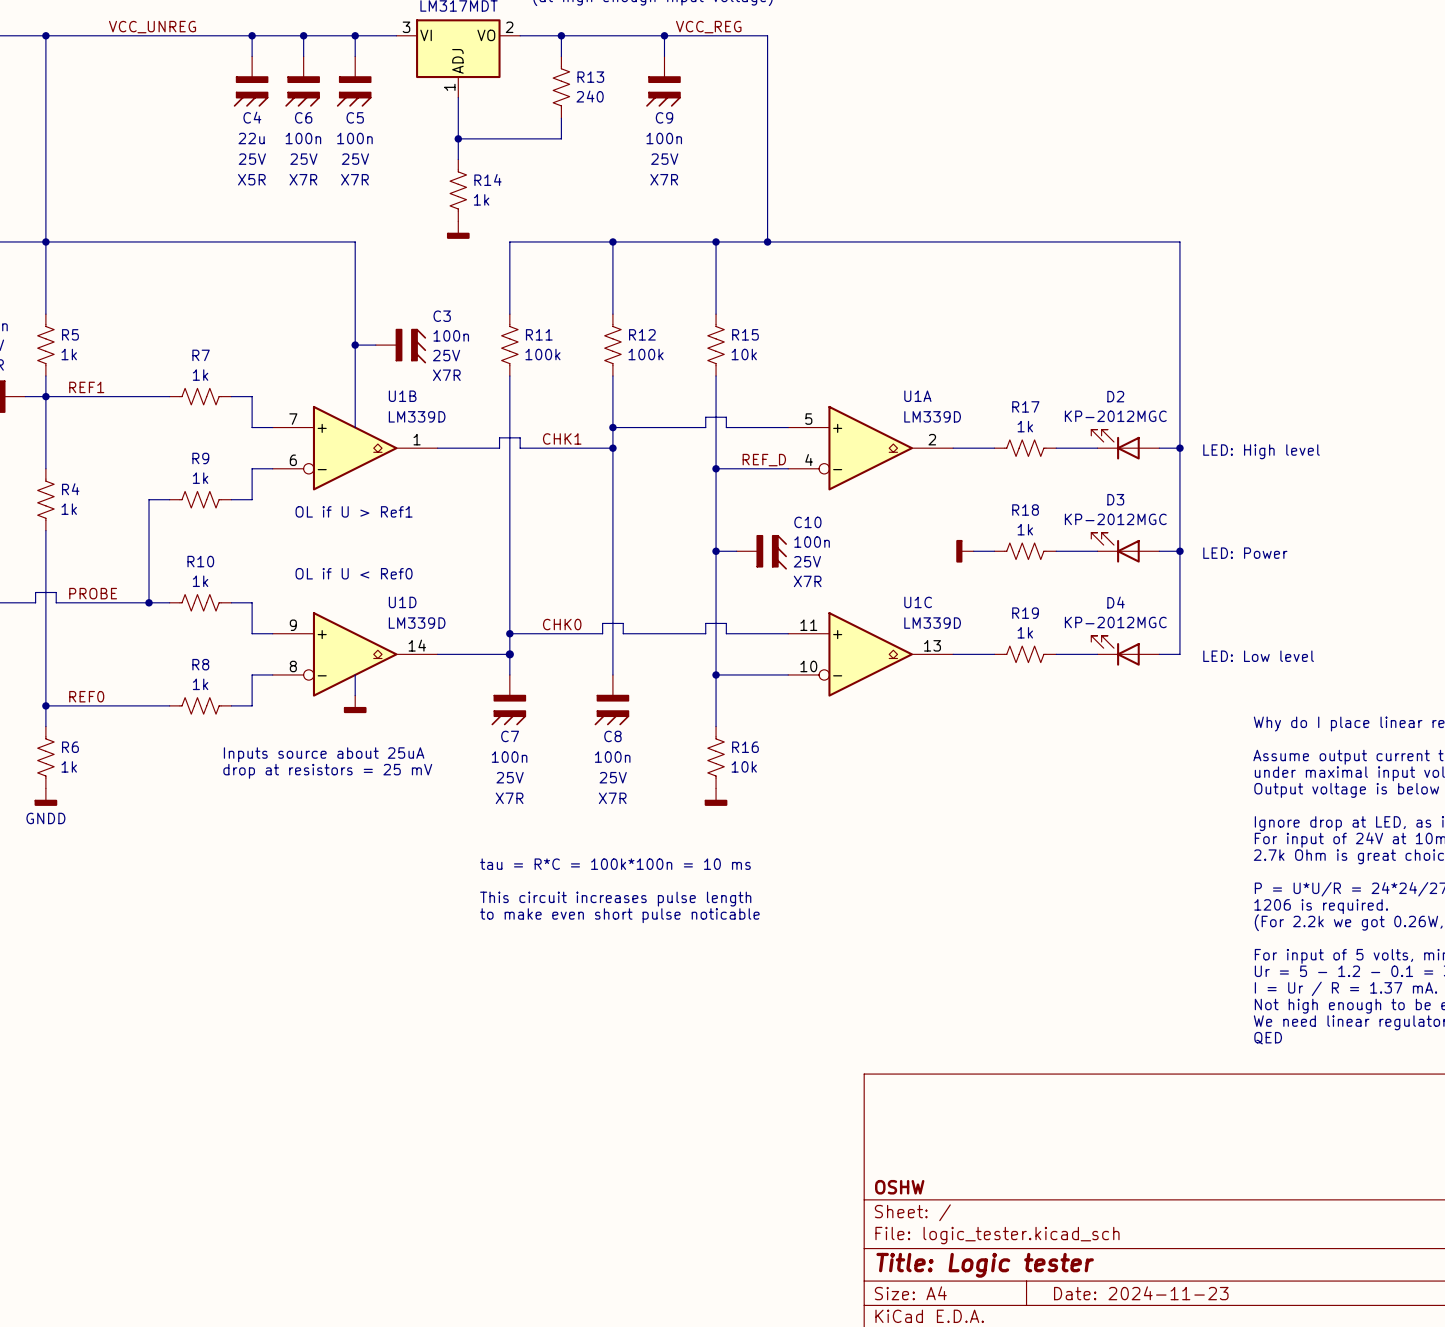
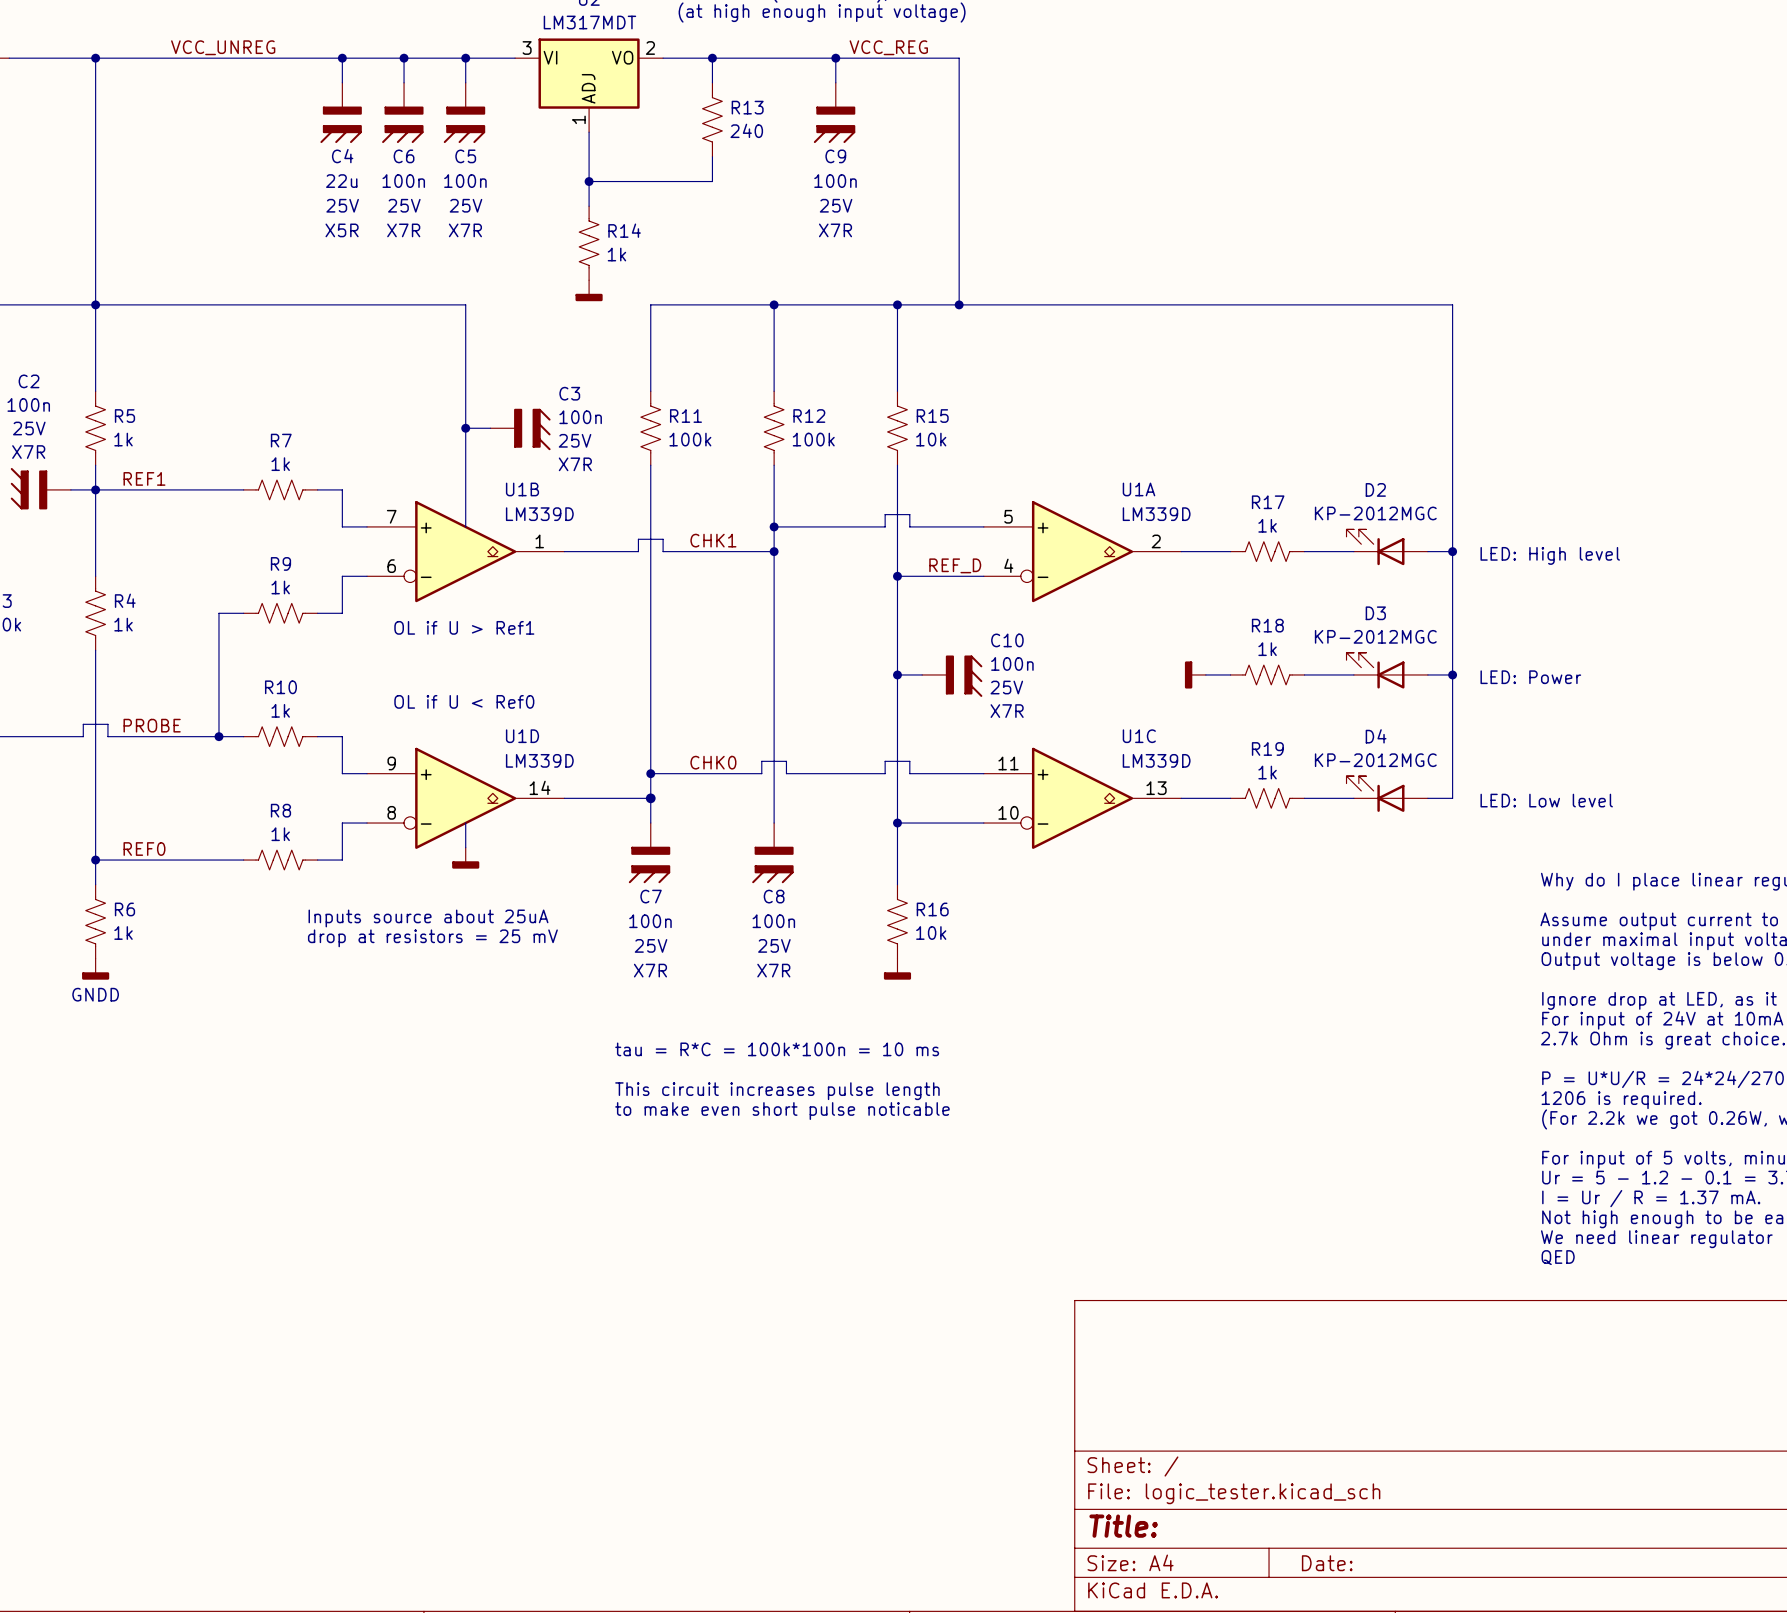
title block: OSHW (899, 1187) -> none
title block: Title: Logic tester (985, 1265) -> Title: (1123, 1526)
title block: Date: 2024-11-23 (1141, 1293) -> Date: (1327, 1563)

